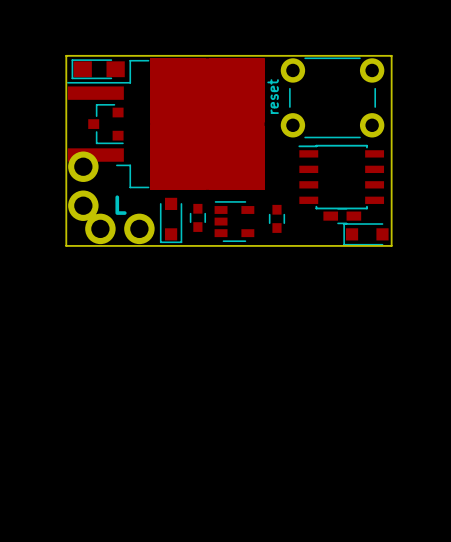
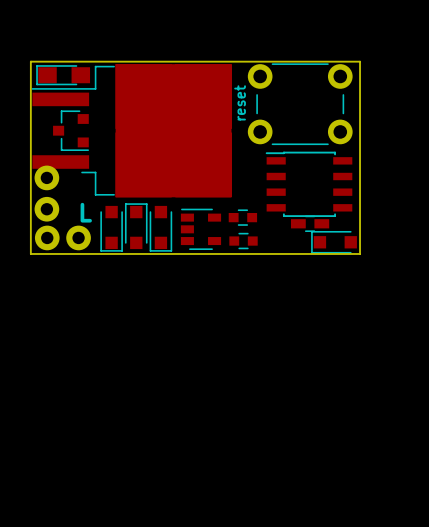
part footprint: [68, 151, 99, 221] -> [34, 165, 60, 222]
part footprint: [189, 203, 206, 232] -> [149, 205, 173, 252]
part: none -> (242, 217)
part: (276, 218) -> none
part rotation: 0° (171, 220) -> 180° (136, 226)
part: none -> (111, 228)
part: (119, 228) -> none
part: none -> (62, 237)
part: none -> (243, 241)

